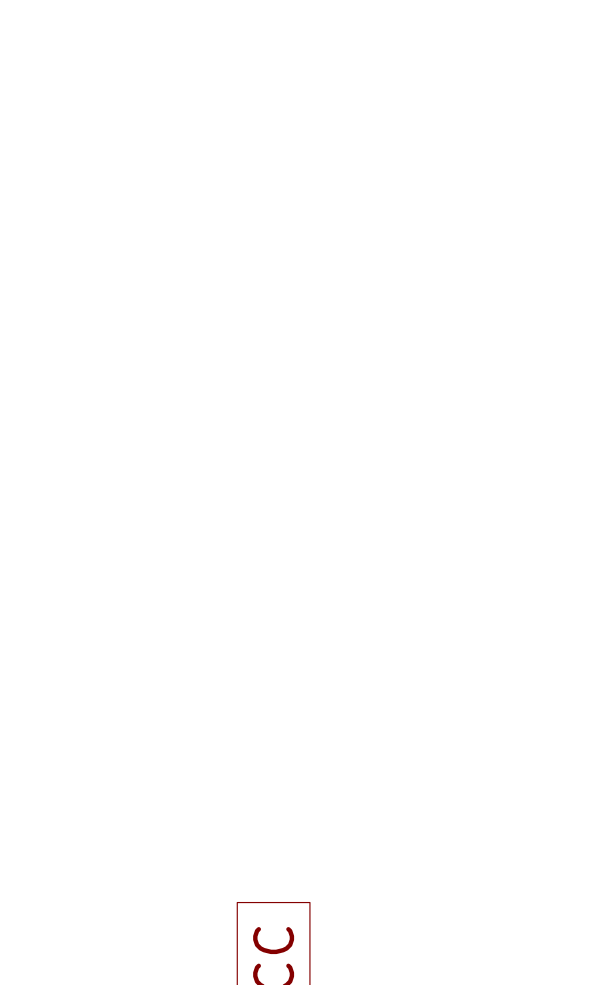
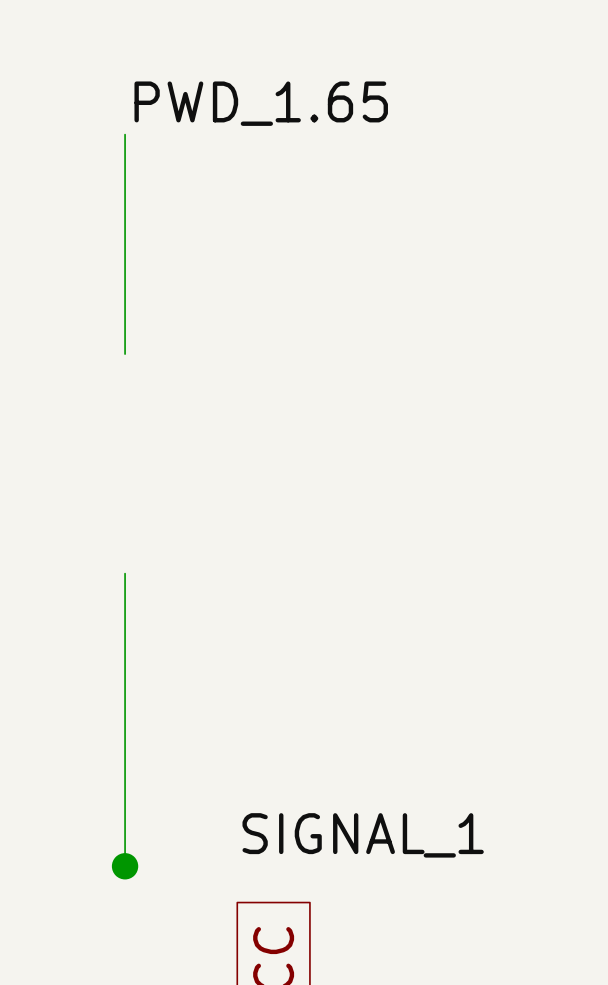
label: none -> PWD_1.65 (261, 103)
wire: none -> (125, 134) (125, 354)
wire: none -> (125, 573) (125, 866)
label: none -> SIGNAL_1 (363, 835)
junction: none -> (125, 866)

